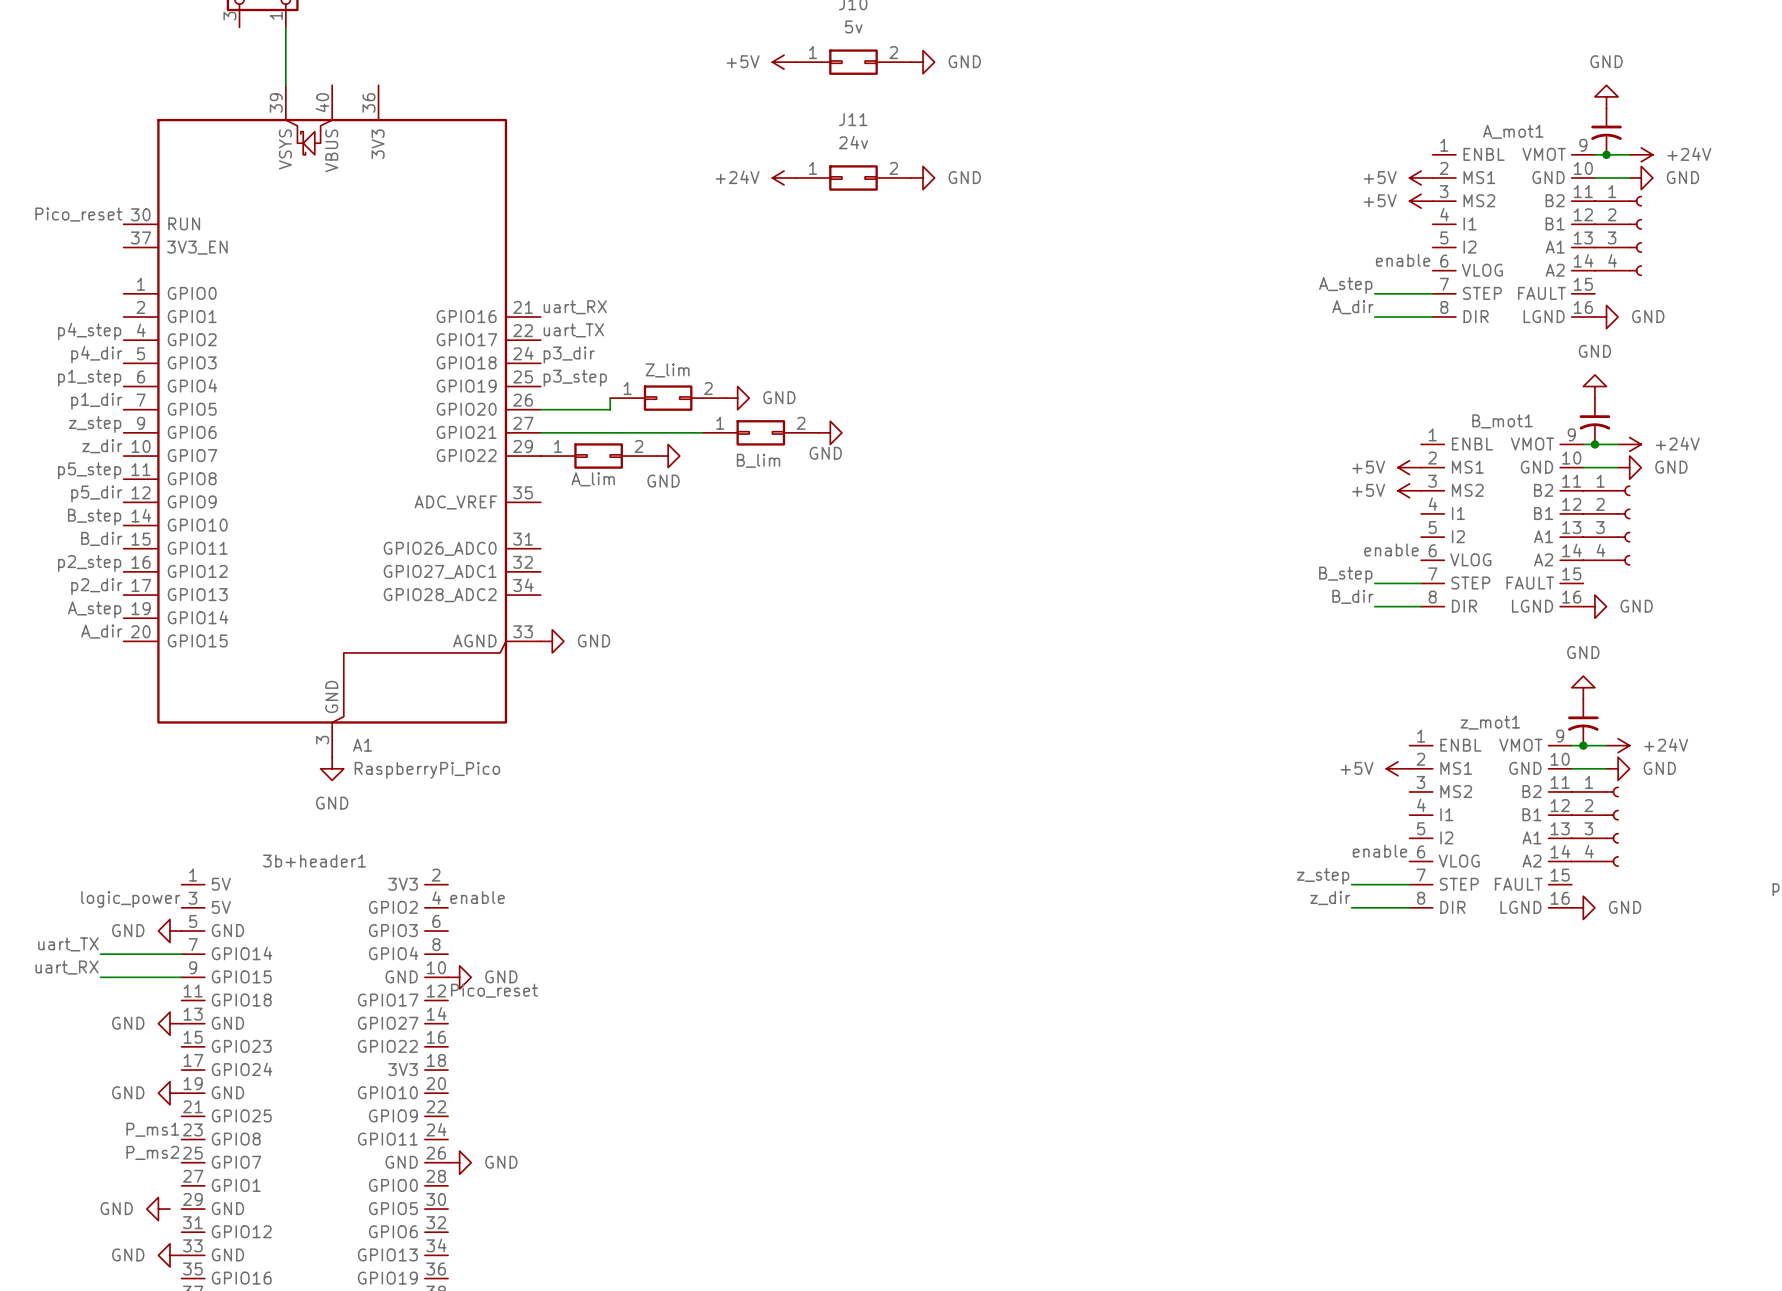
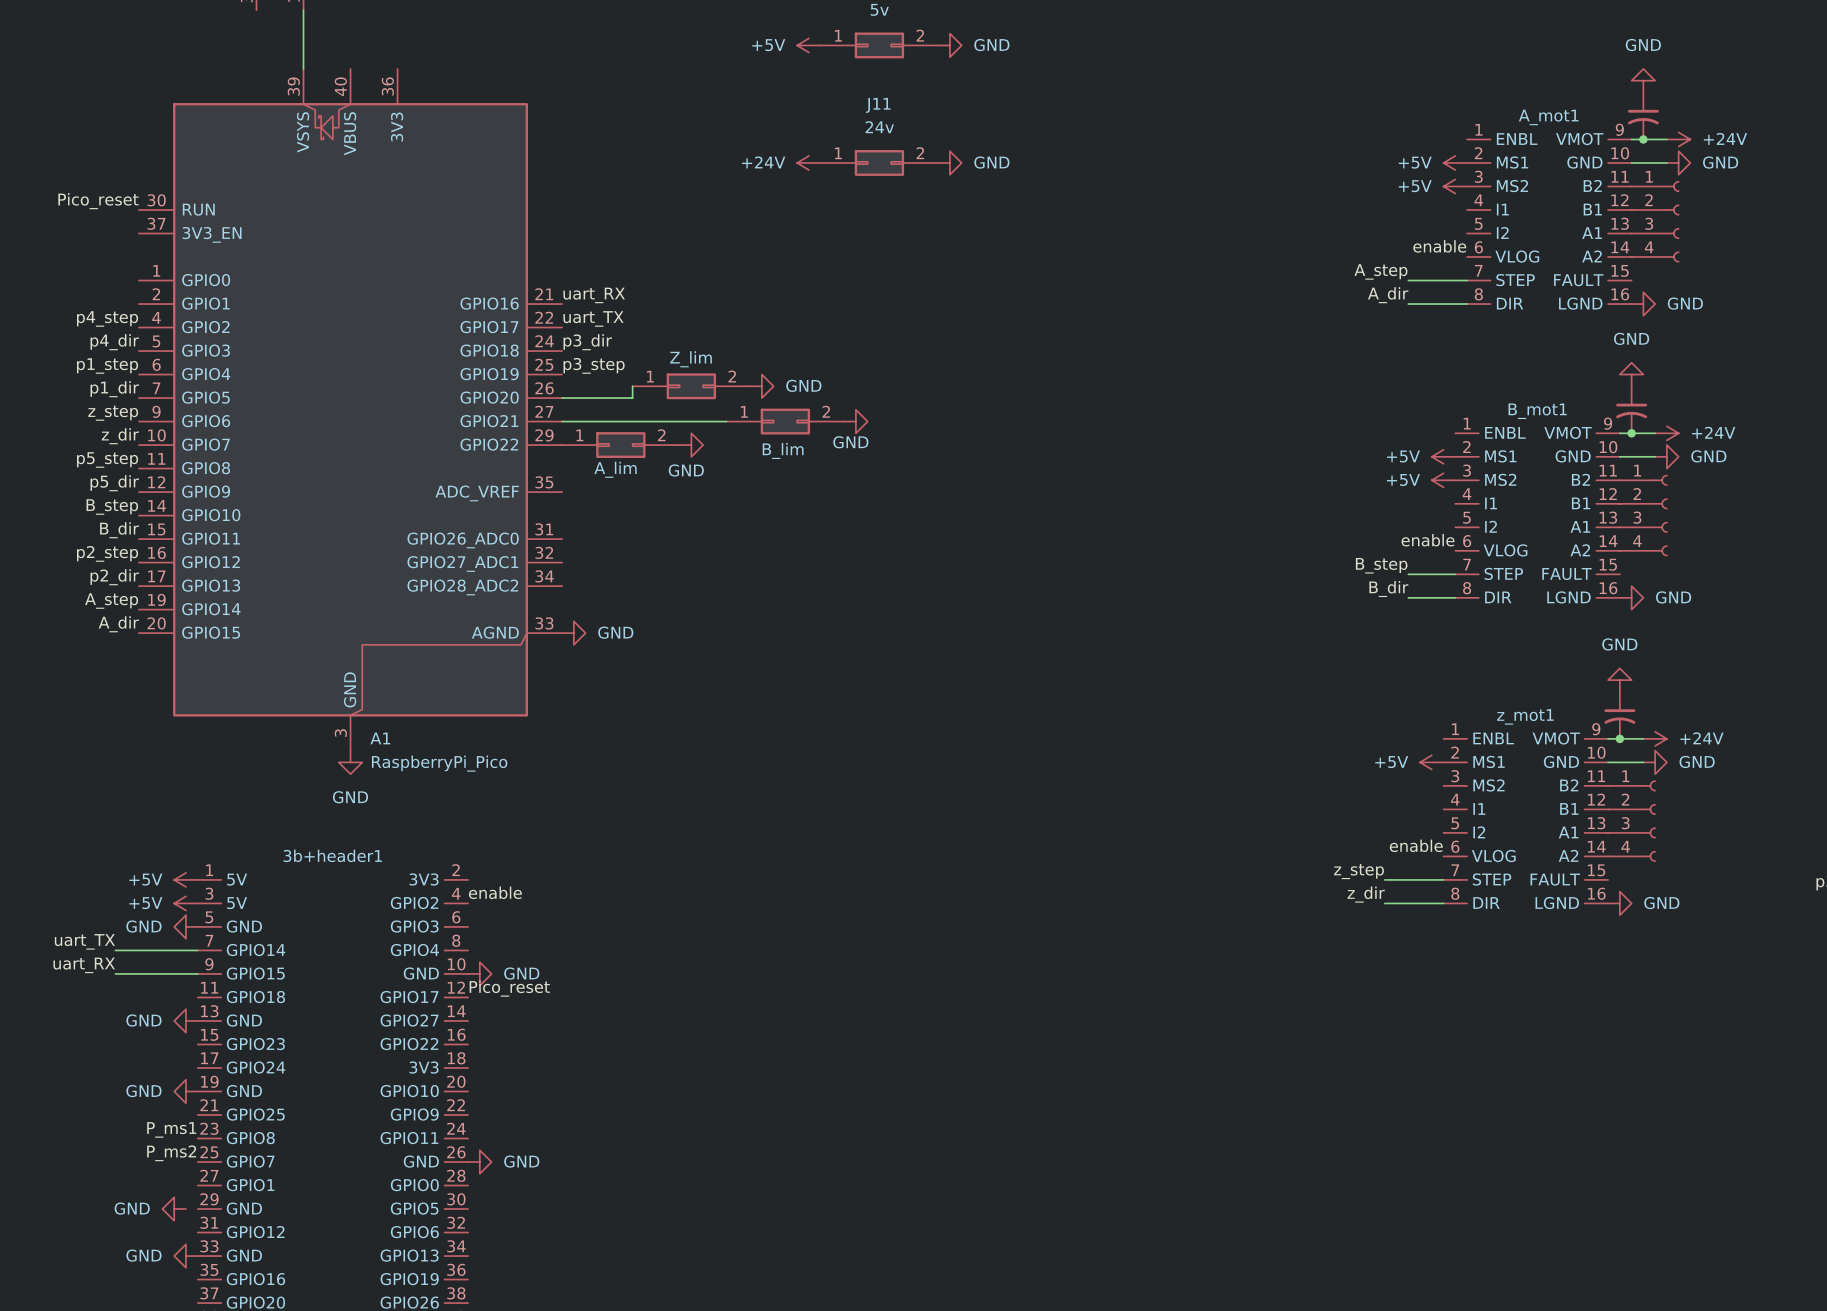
power symbol: none -> +5V (185, 879)
label: logic_power (130, 899) -> none
power symbol: none -> +5V (185, 903)

